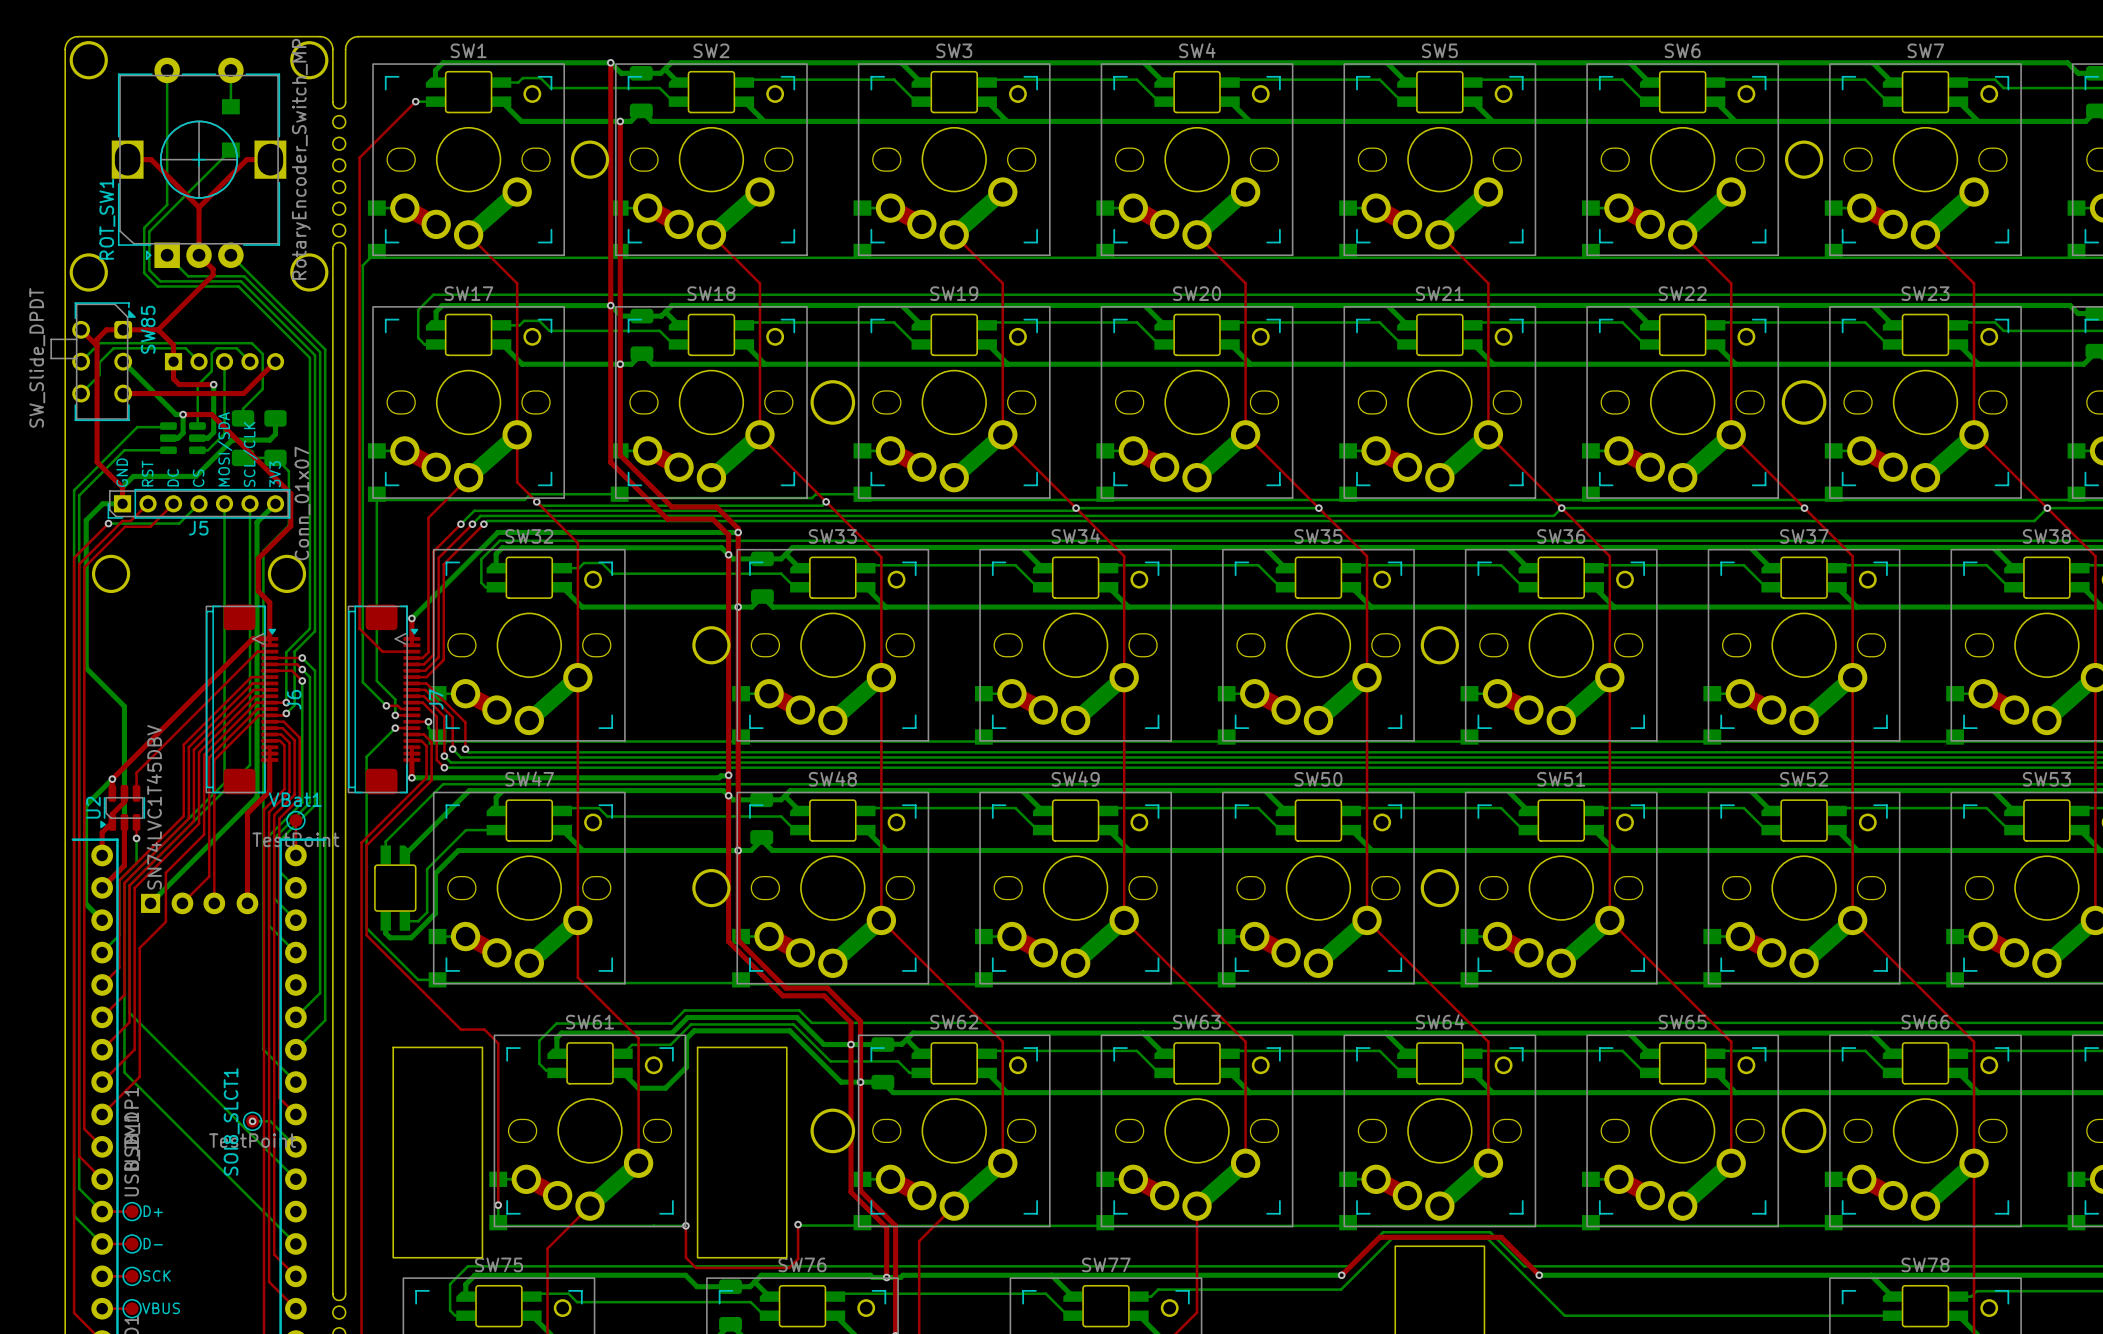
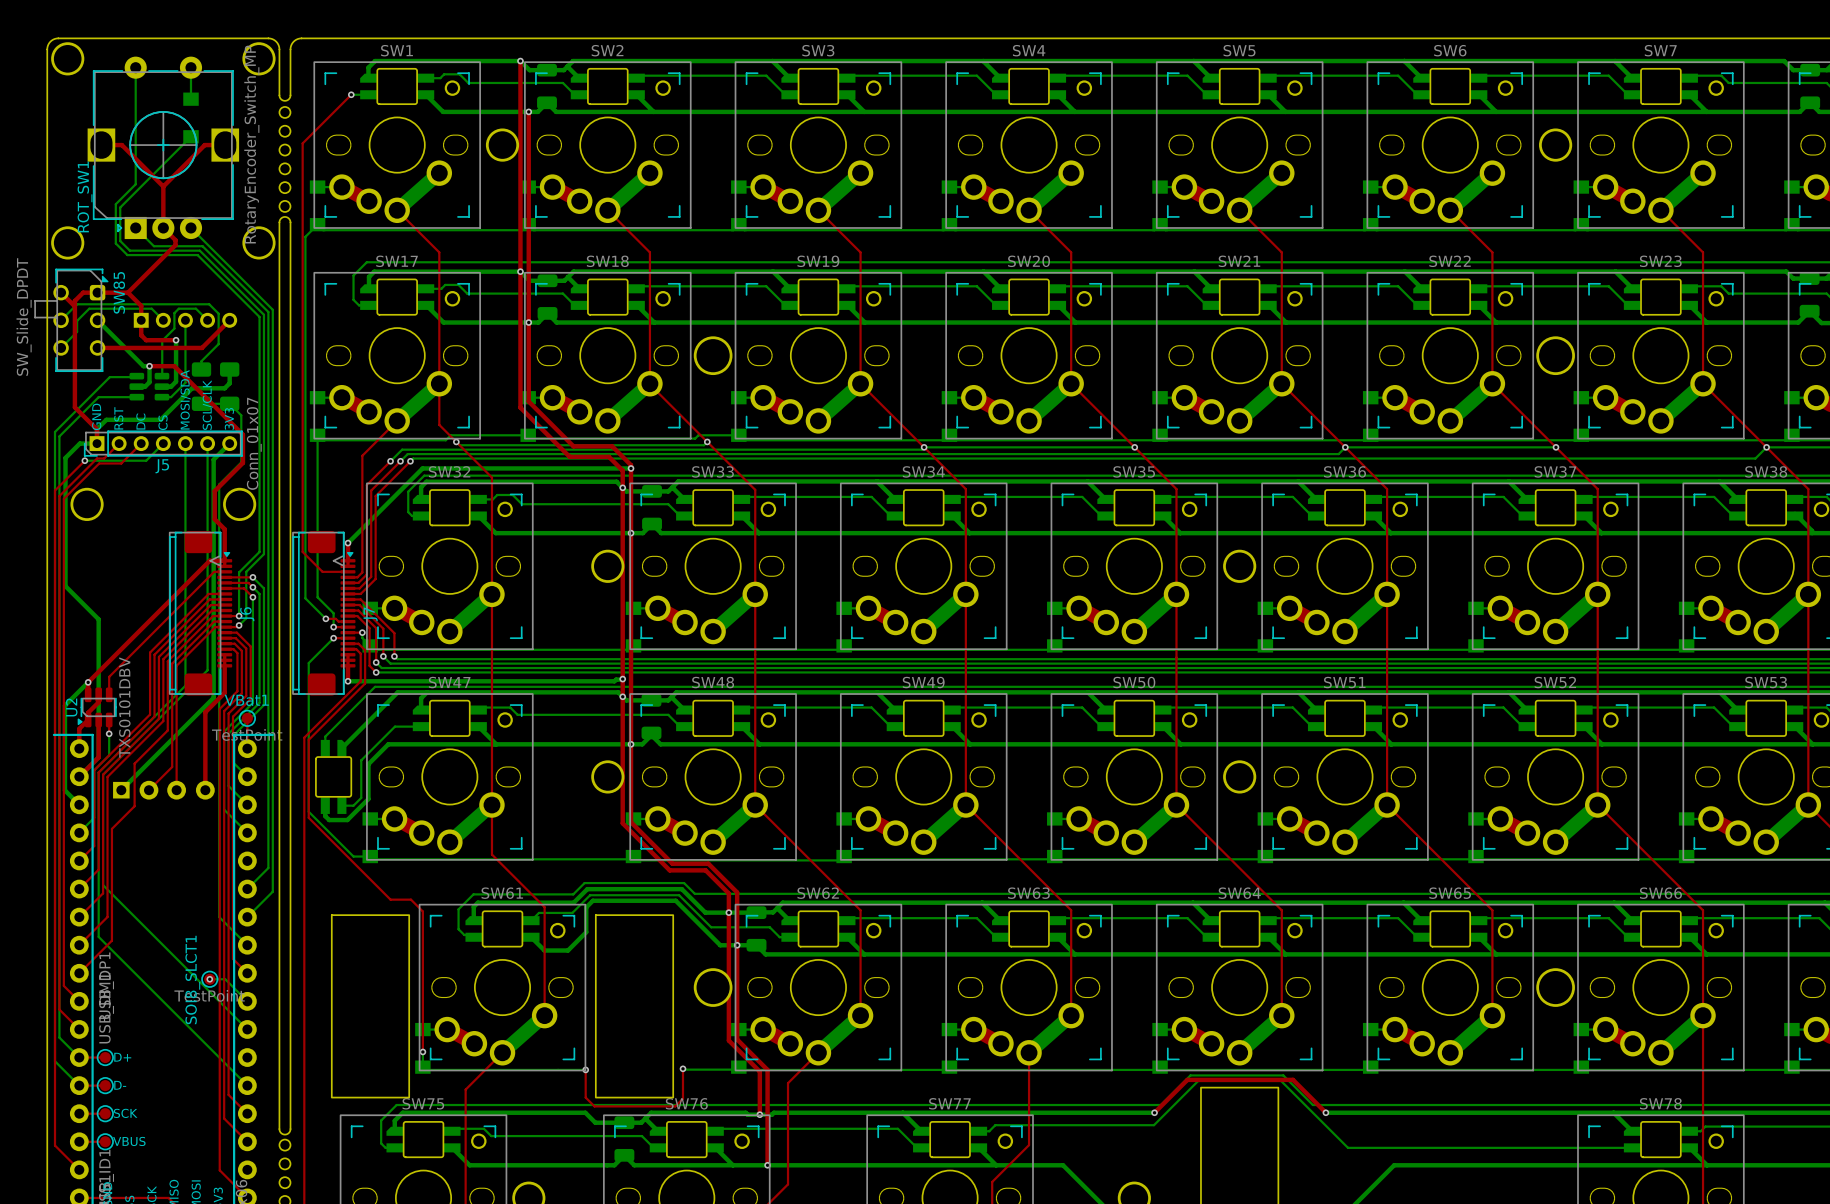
U2 value: SN74LVC1T45DBV (154, 807) -> TXS0101DBV (124, 707)

